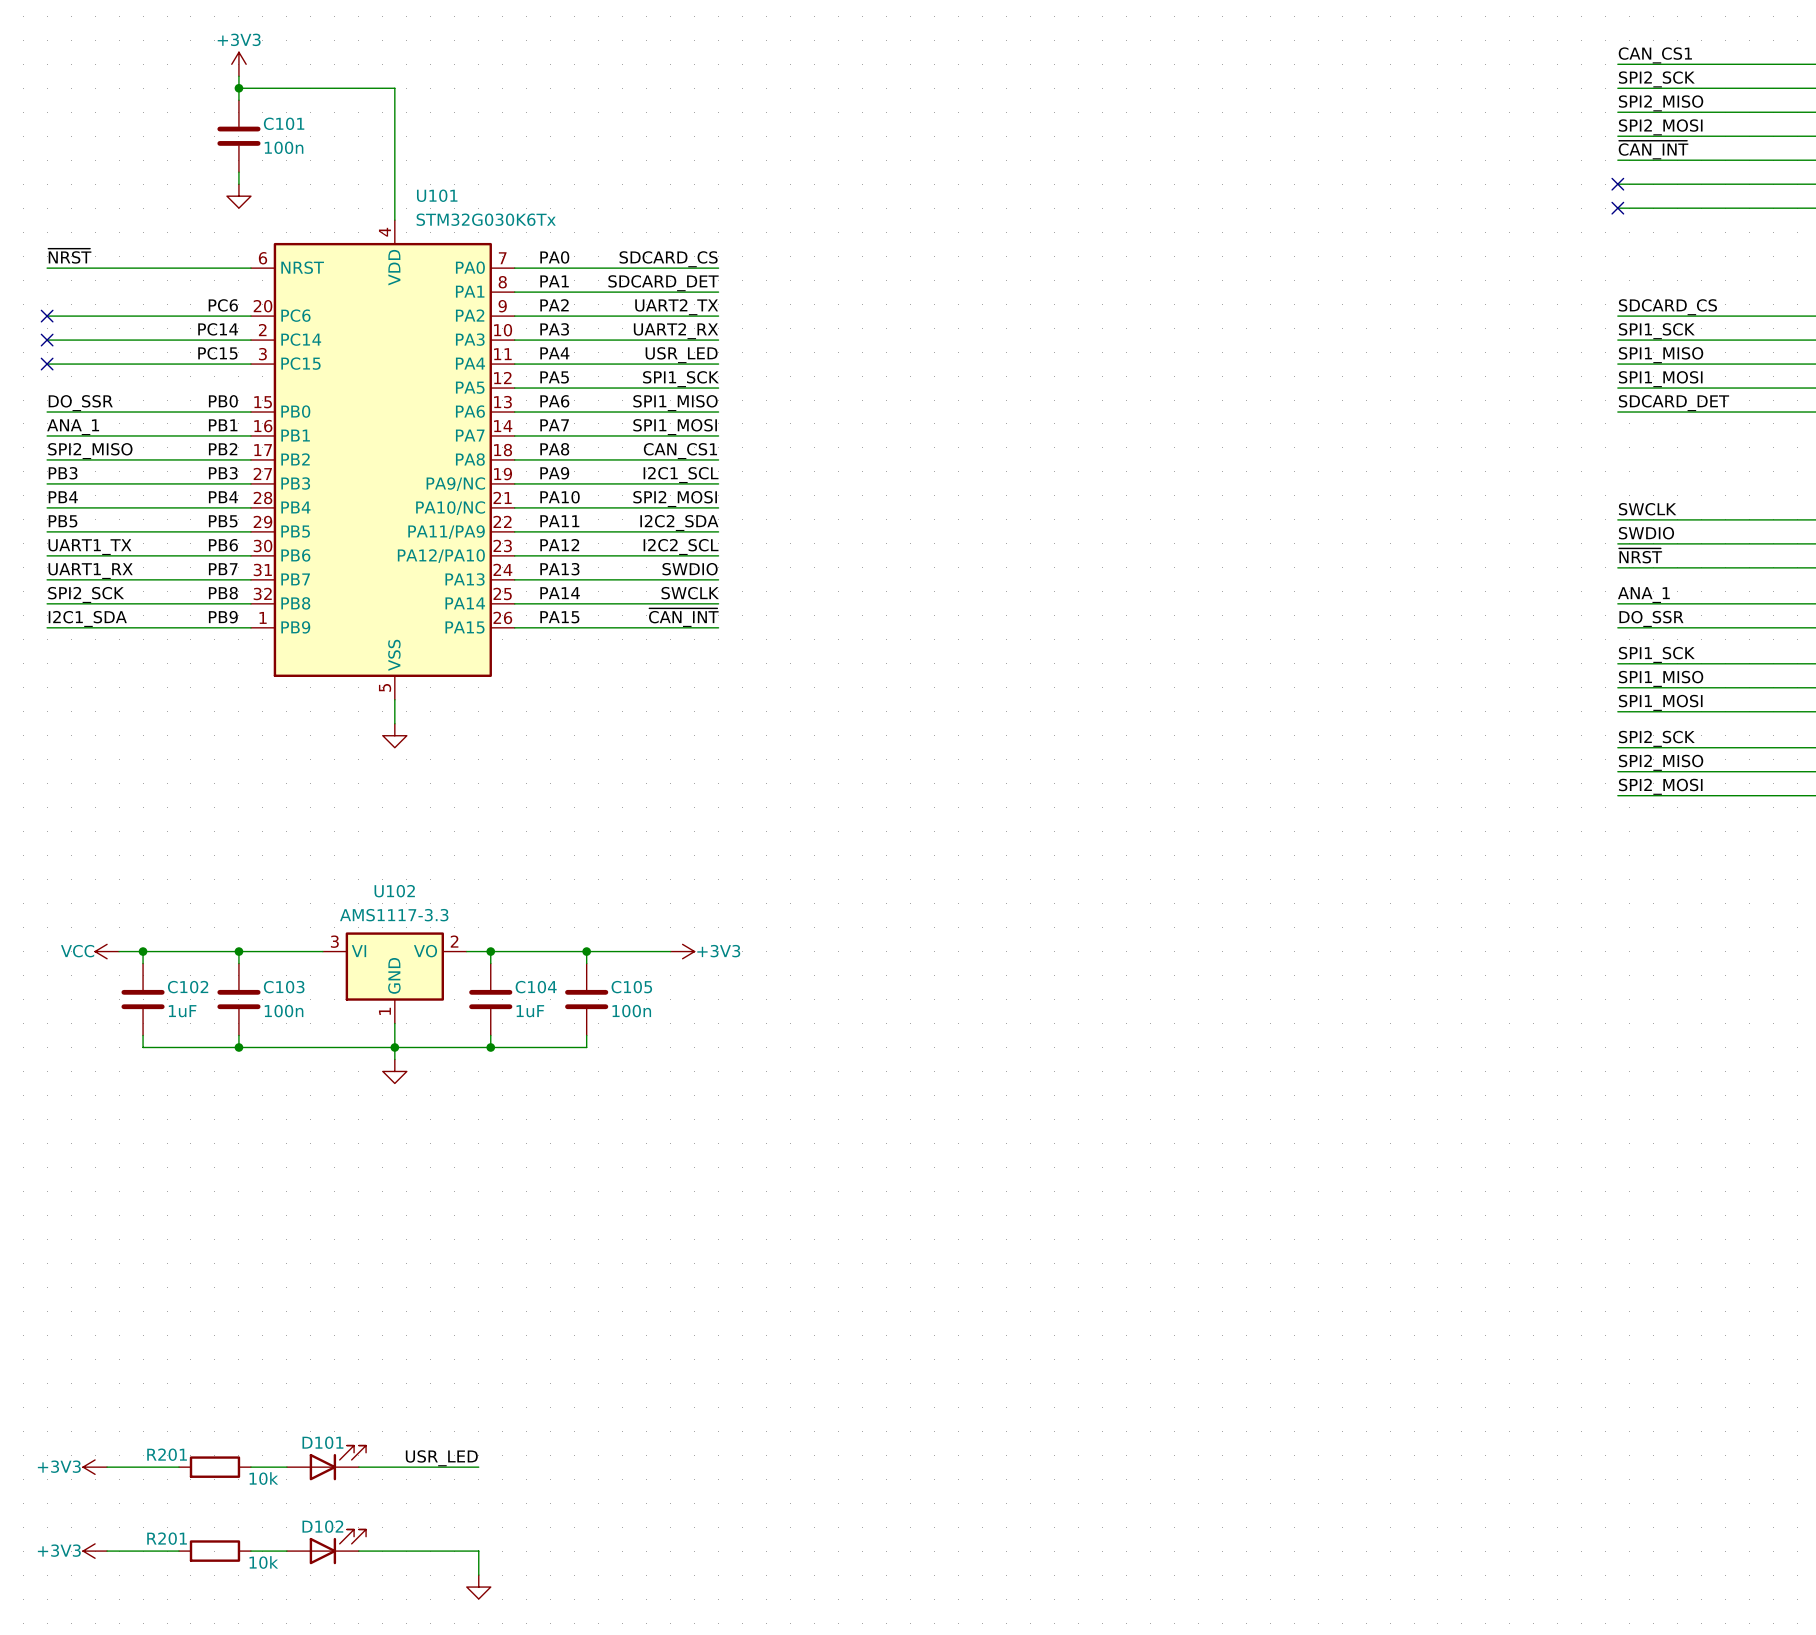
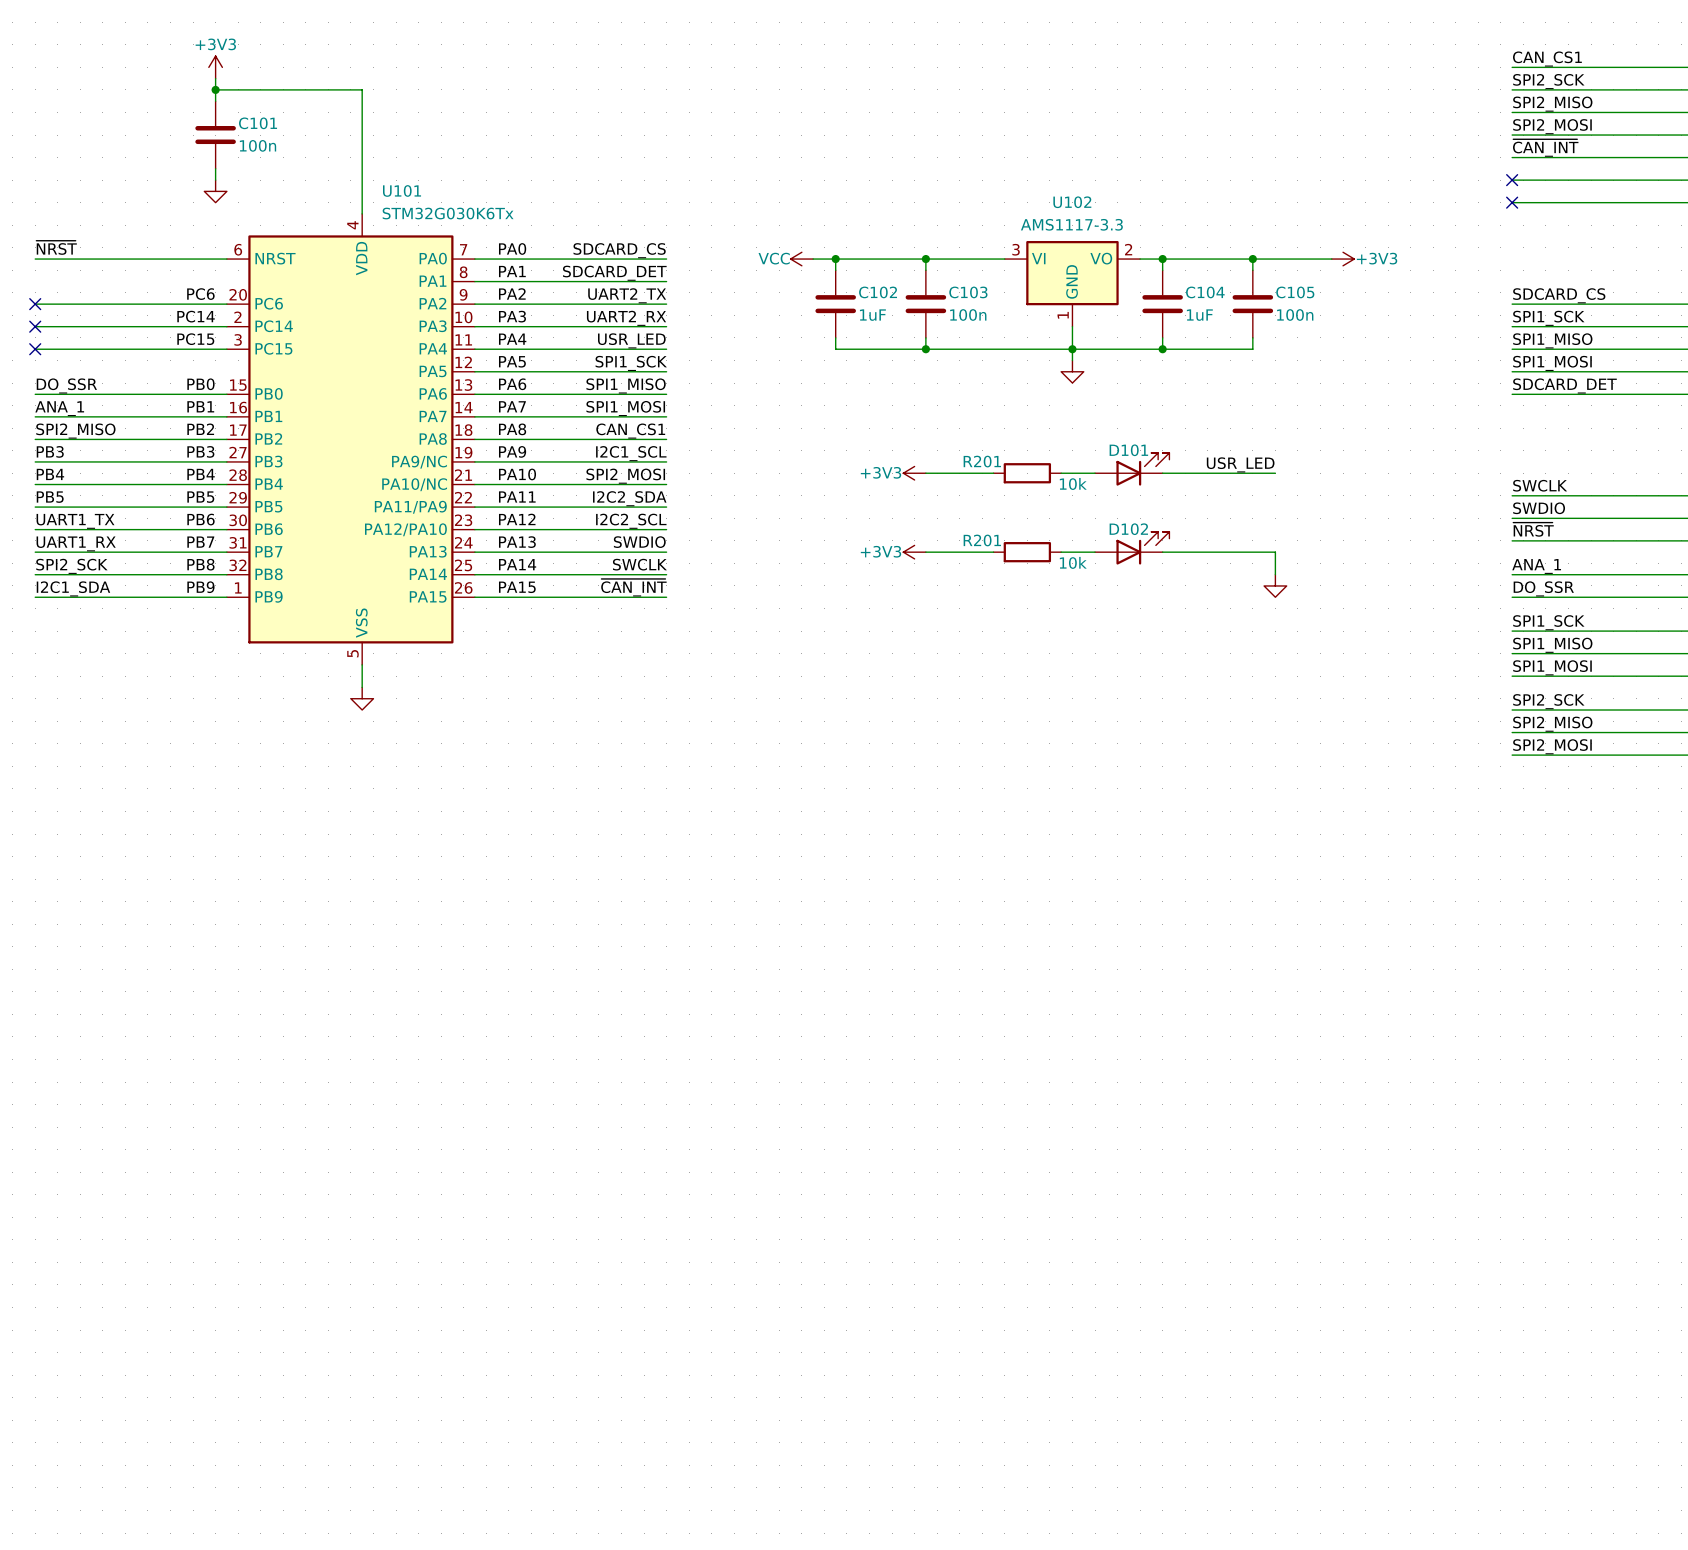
power symbol: none -> VCC (801, 259)
wire: none -> (813, 259) (1004, 259)
wire: none -> (835, 259) (835, 270)
junction: none -> (835, 259)
wire: none -> (925, 259) (925, 270)
junction: none -> (925, 259)
wire: none -> (1140, 259) (1331, 259)
wire: none -> (1162, 259) (1162, 270)
junction: none -> (1162, 259)
wire: none -> (1252, 259) (1252, 270)
junction: none -> (1252, 259)
power symbol: none -> +3V3 (1343, 259)
wire: none -> (1072, 326) (1072, 360)
wire: none -> (835, 337) (835, 349) (1252, 349) (1252, 337)
wire: none -> (925, 337) (925, 349)
wire: none -> (1162, 337) (1162, 349)
junction: none -> (925, 349)
junction: none -> (1072, 349)
junction: none -> (1162, 349)
power symbol: none -> (1072, 371)
label: none -> USR_LED (1240, 464)
power symbol: none -> +3V3 (914, 473)
wire: none -> (925, 473) (993, 473)
R201: none -> 10k (1027, 473)
wire: none -> (1061, 473) (1095, 473)
wire: none -> (1162, 473) (1275, 473)
power symbol: none -> +3V3 (914, 552)
wire: none -> (925, 552) (993, 552)
R201: none -> 10k (1027, 552)
wire: none -> (1061, 552) (1095, 552)
wire: none -> (1162, 552) (1275, 552) (1275, 574)
power symbol: none -> (1275, 585)
power symbol: VCC (107, 951) -> none
wire: (119, 951) (322, 951) -> none
wire: (143, 951) (143, 963) -> none
junction: (143, 951) -> none
wire: (238, 951) (238, 963) -> none
junction: (238, 951) -> none
wire: (466, 951) (670, 951) -> none
wire: (490, 951) (490, 963) -> none
junction: (490, 951) -> none
wire: (586, 951) (586, 963) -> none
junction: (586, 951) -> none
power symbol: +3V3 (682, 951) -> none
U102 position: (394, 977) -> (1072, 283)
C102 position: (143, 999) -> (835, 304)
C103 position: (238, 999) -> (925, 304)
C104 position: (490, 999) -> (1162, 304)
C105 position: (586, 999) -> (1252, 304)
wire: (394, 1023) (394, 1059) -> none
wire: (143, 1035) (143, 1047) (586, 1047) (586, 1035) -> none
wire: (238, 1035) (238, 1047) -> none
wire: (490, 1035) (490, 1047) -> none
junction: (238, 1047) -> none
junction: (394, 1047) -> none
junction: (490, 1047) -> none
power symbol: (394, 1071) -> none
label: USR_LED (441, 1458) -> none
D101 position: (326, 1462) -> (1132, 469)
power symbol: +3V3 (95, 1467) -> none
wire: (107, 1467) (179, 1467) -> none
R201: 10k (214, 1467) -> none
wire: (250, 1467) (286, 1467) -> none
wire: (358, 1467) (478, 1467) -> none
D102 position: (326, 1546) -> (1132, 548)
power symbol: +3V3 (95, 1551) -> none
wire: (107, 1551) (179, 1551) -> none
R201: 10k (214, 1551) -> none
wire: (250, 1551) (286, 1551) -> none
wire: (358, 1551) (478, 1551) (478, 1575) -> none
power symbol: (478, 1587) -> none

